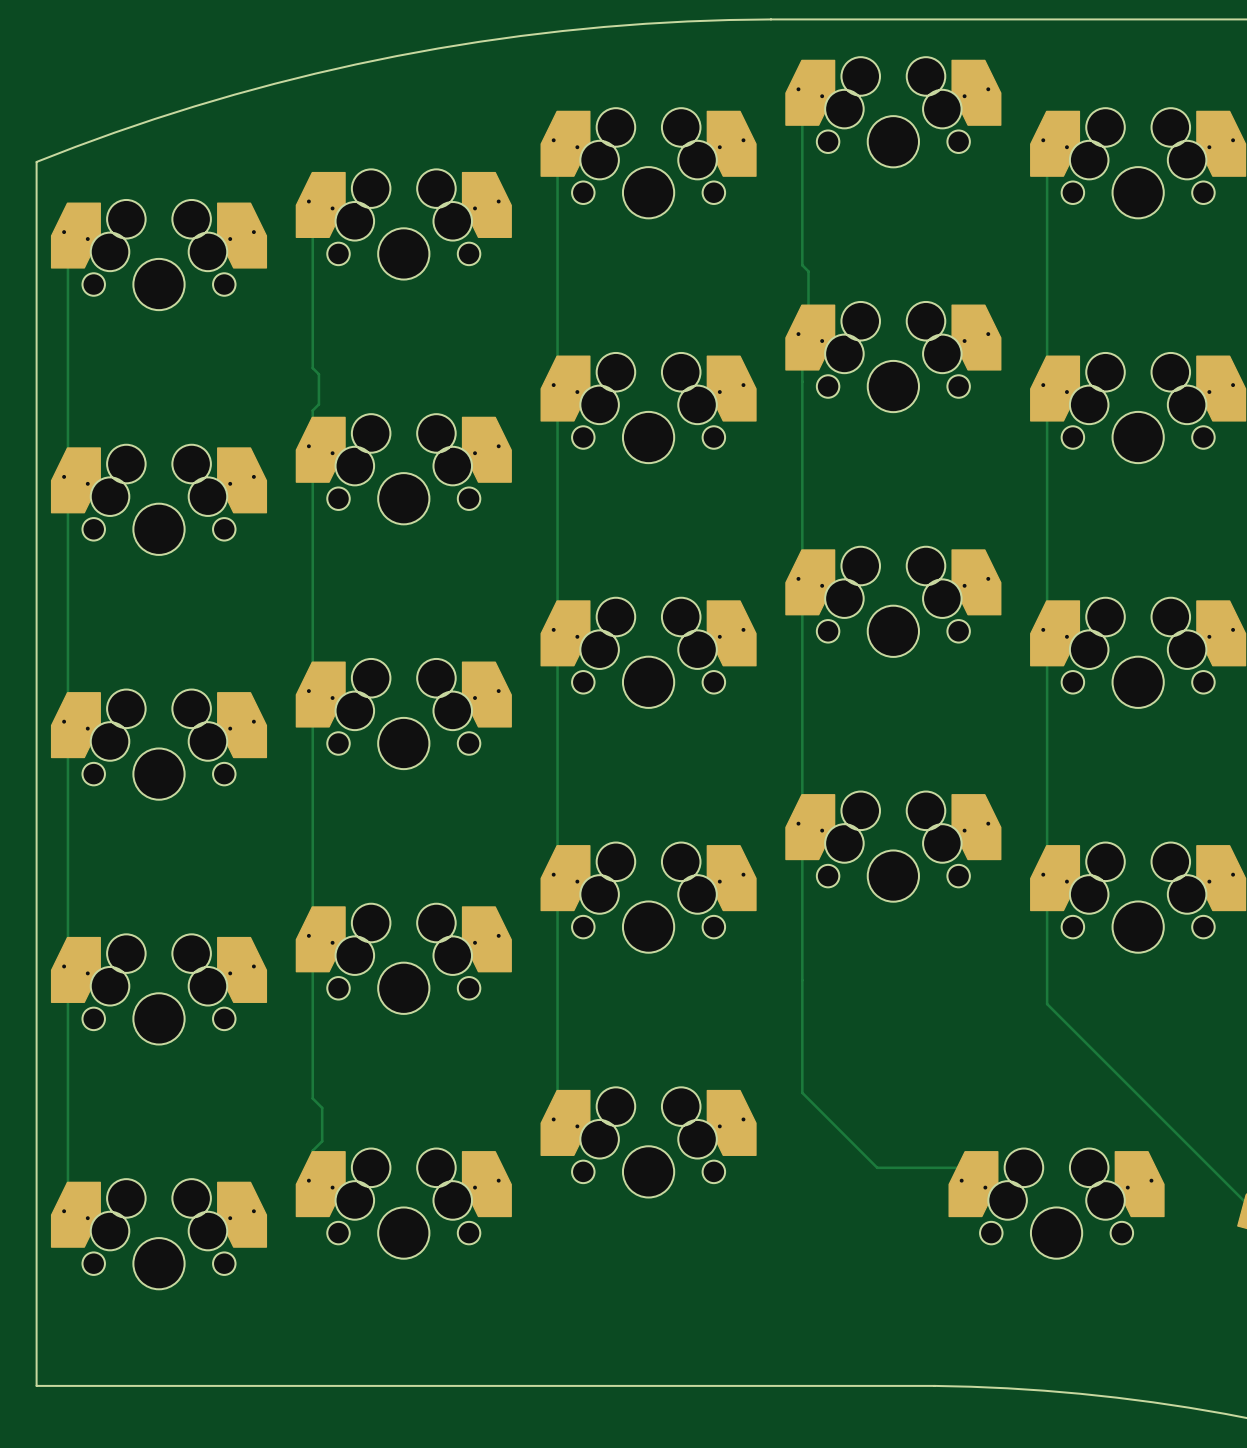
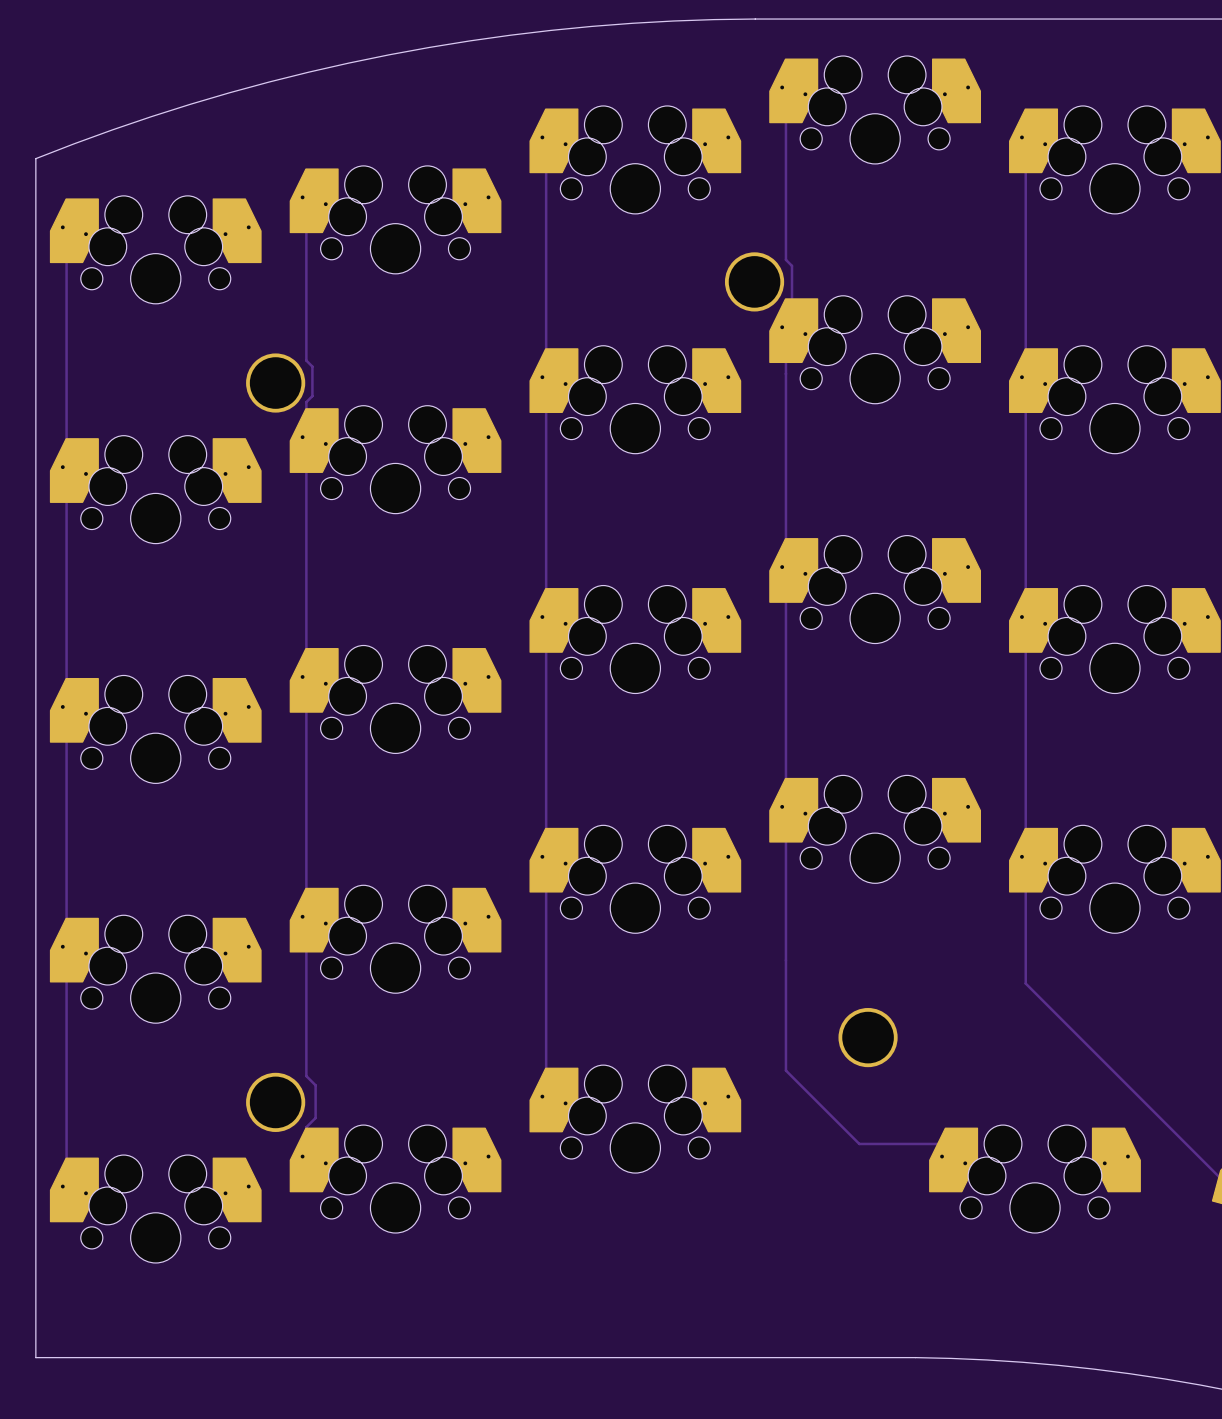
part: none -> (754, 281)
part: none -> (275, 383)
part: none -> (868, 1037)
part: none -> (275, 1102)

